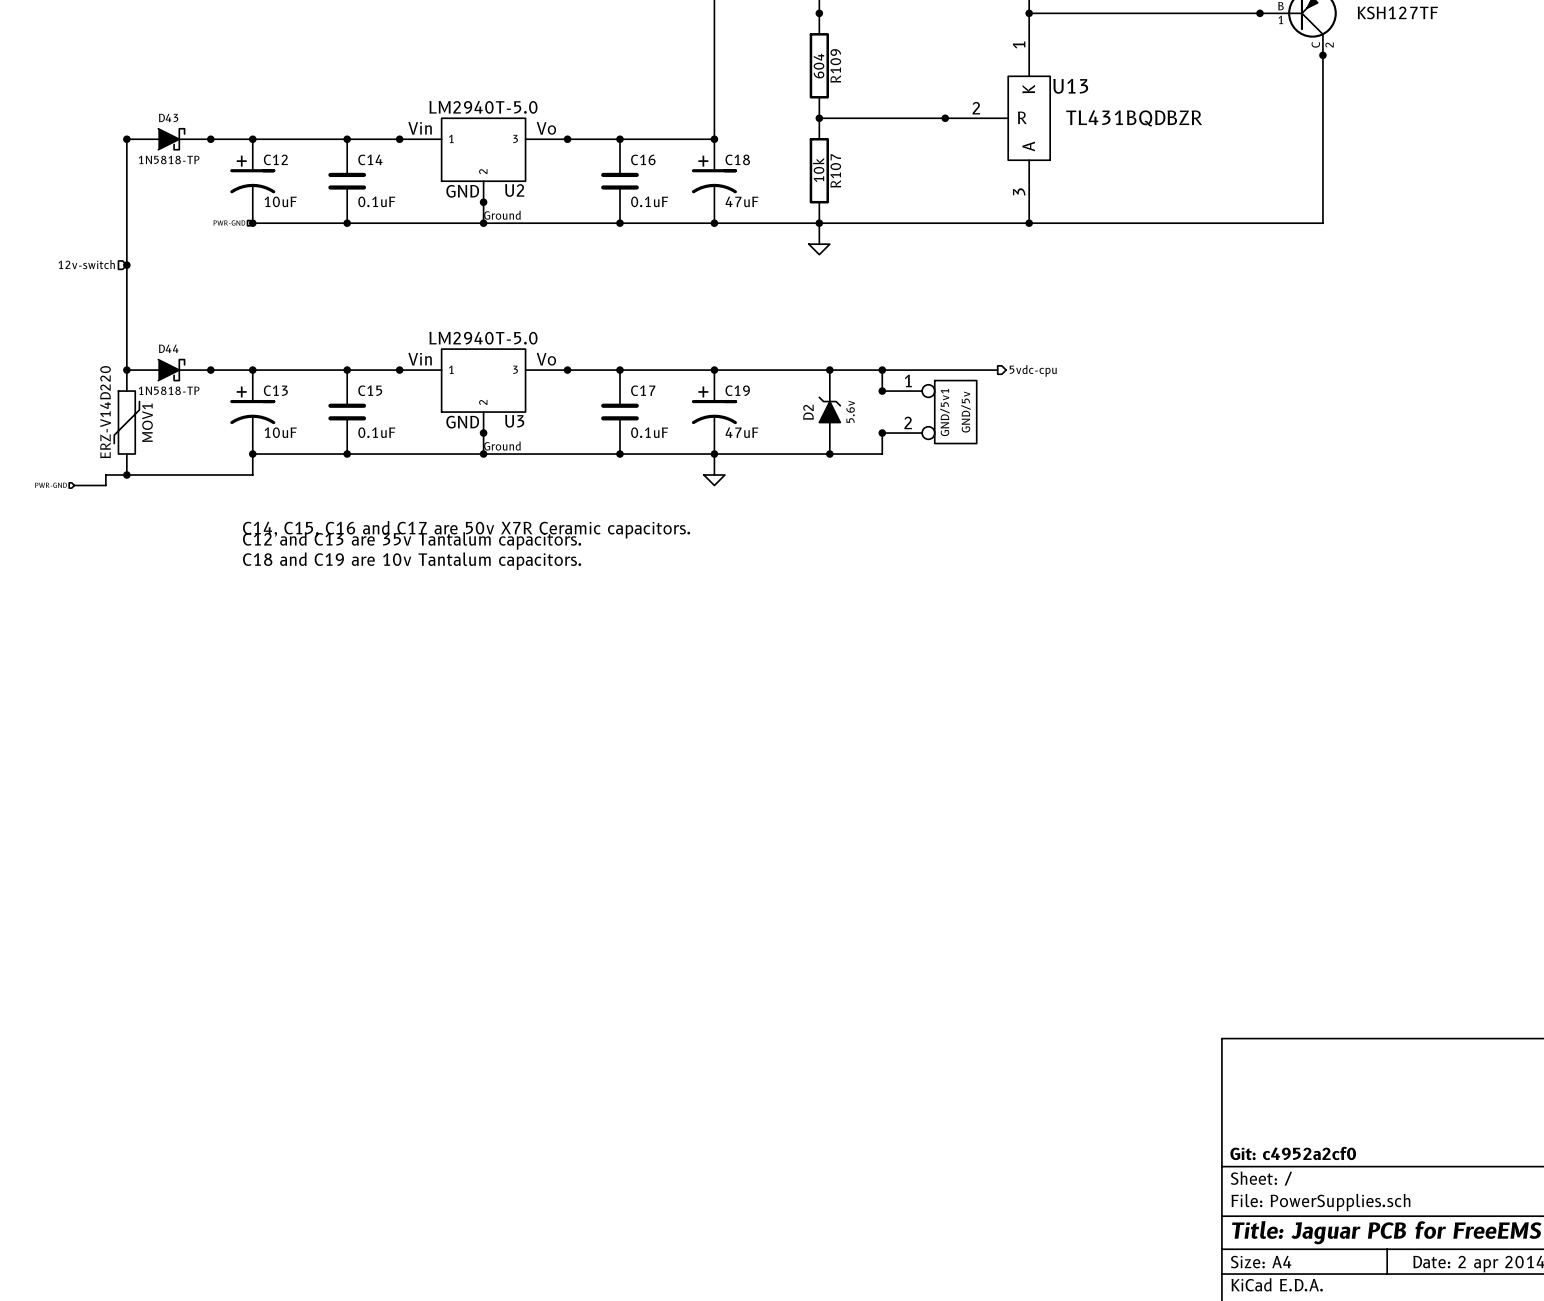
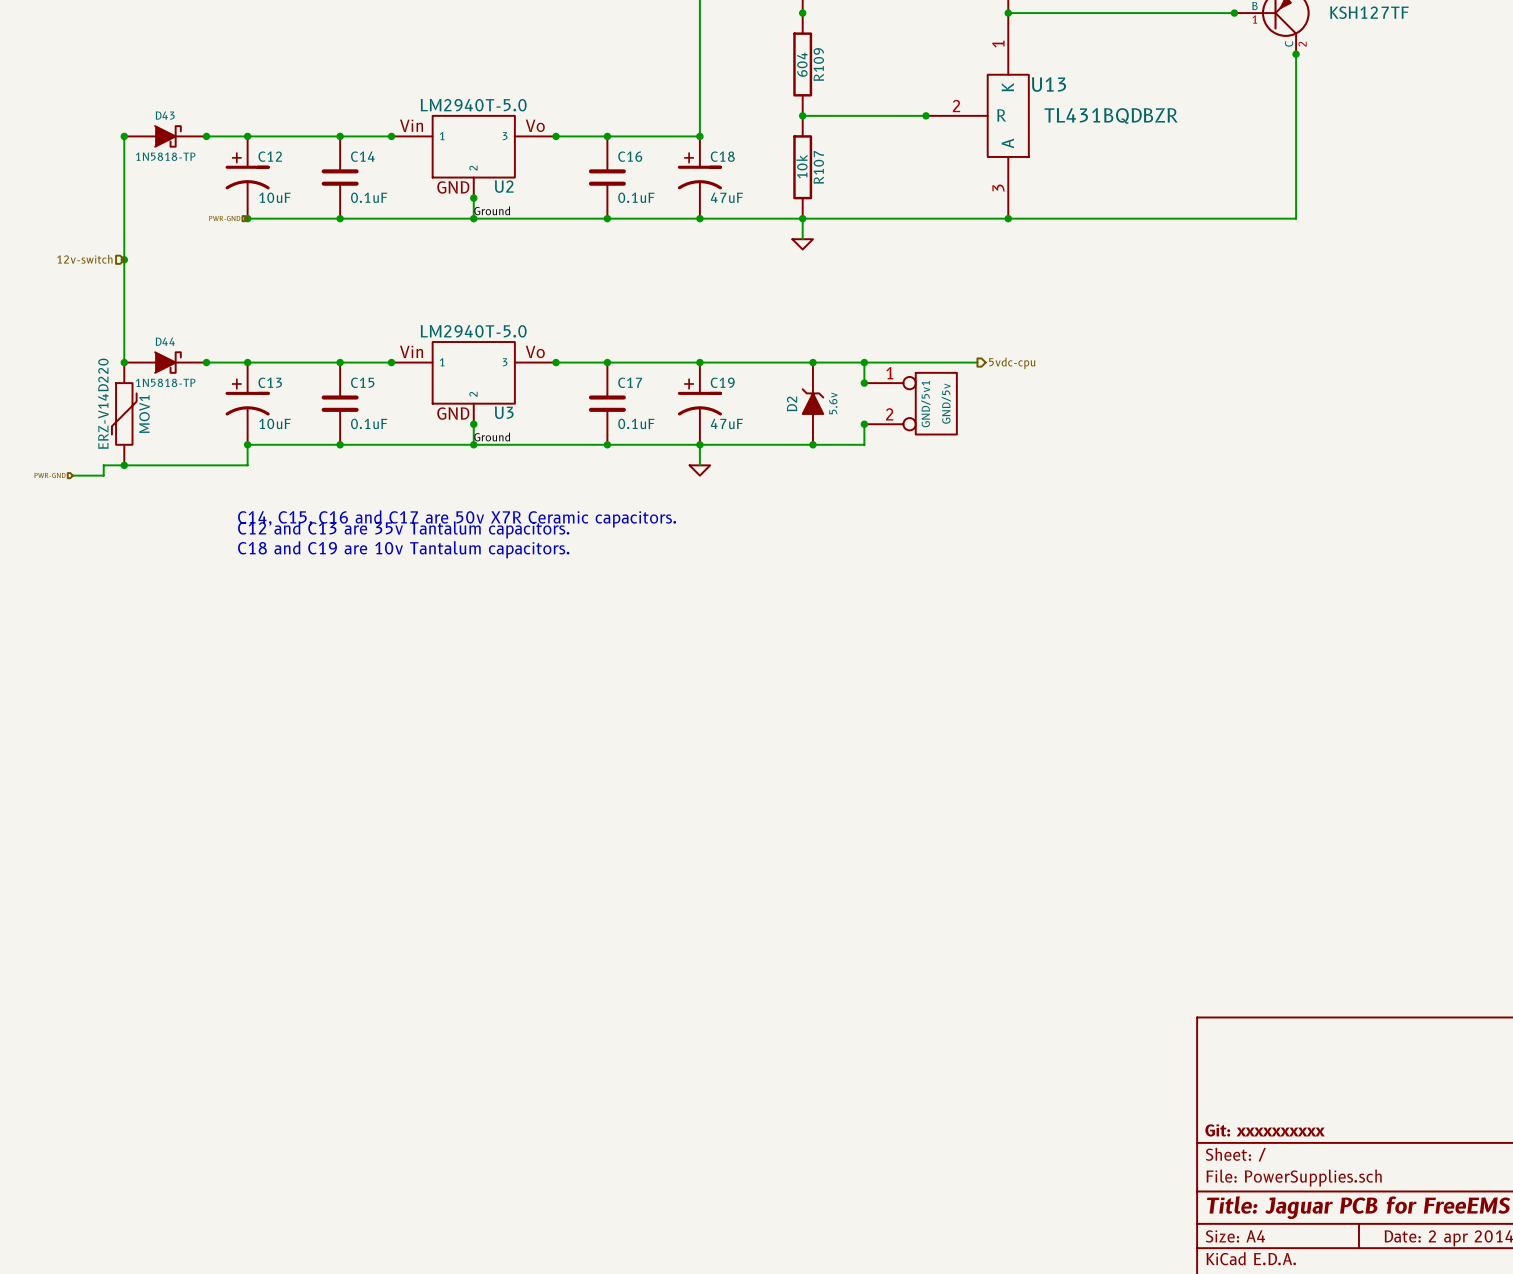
title block: Git: c4952a2cf0 (1293, 1153) -> Git: xxxxxxxxxx (1265, 1130)

